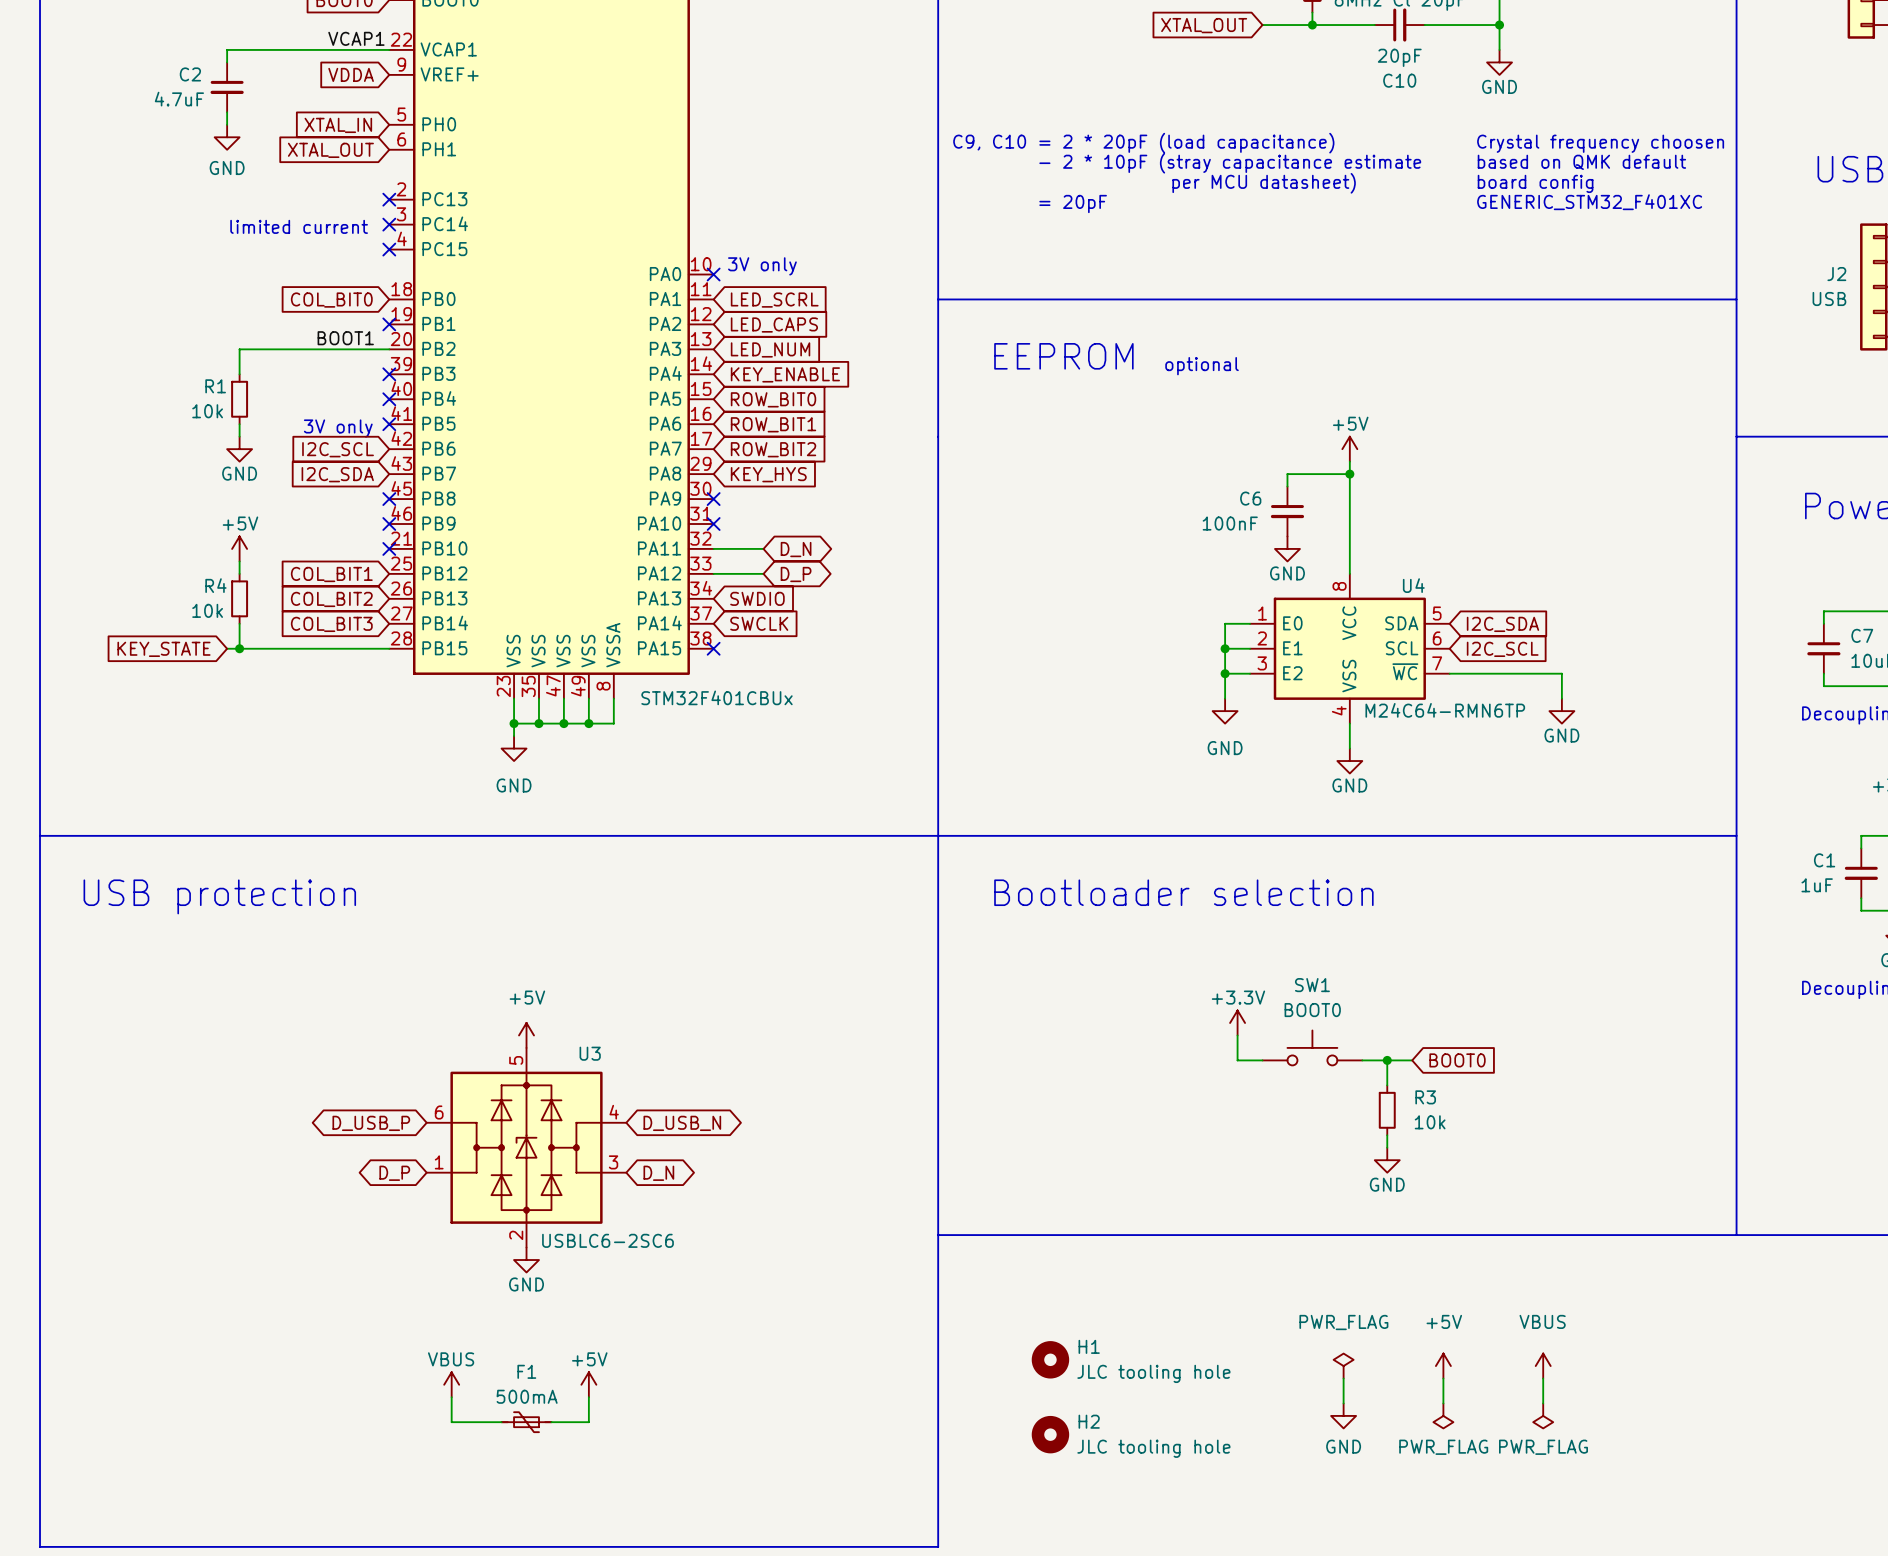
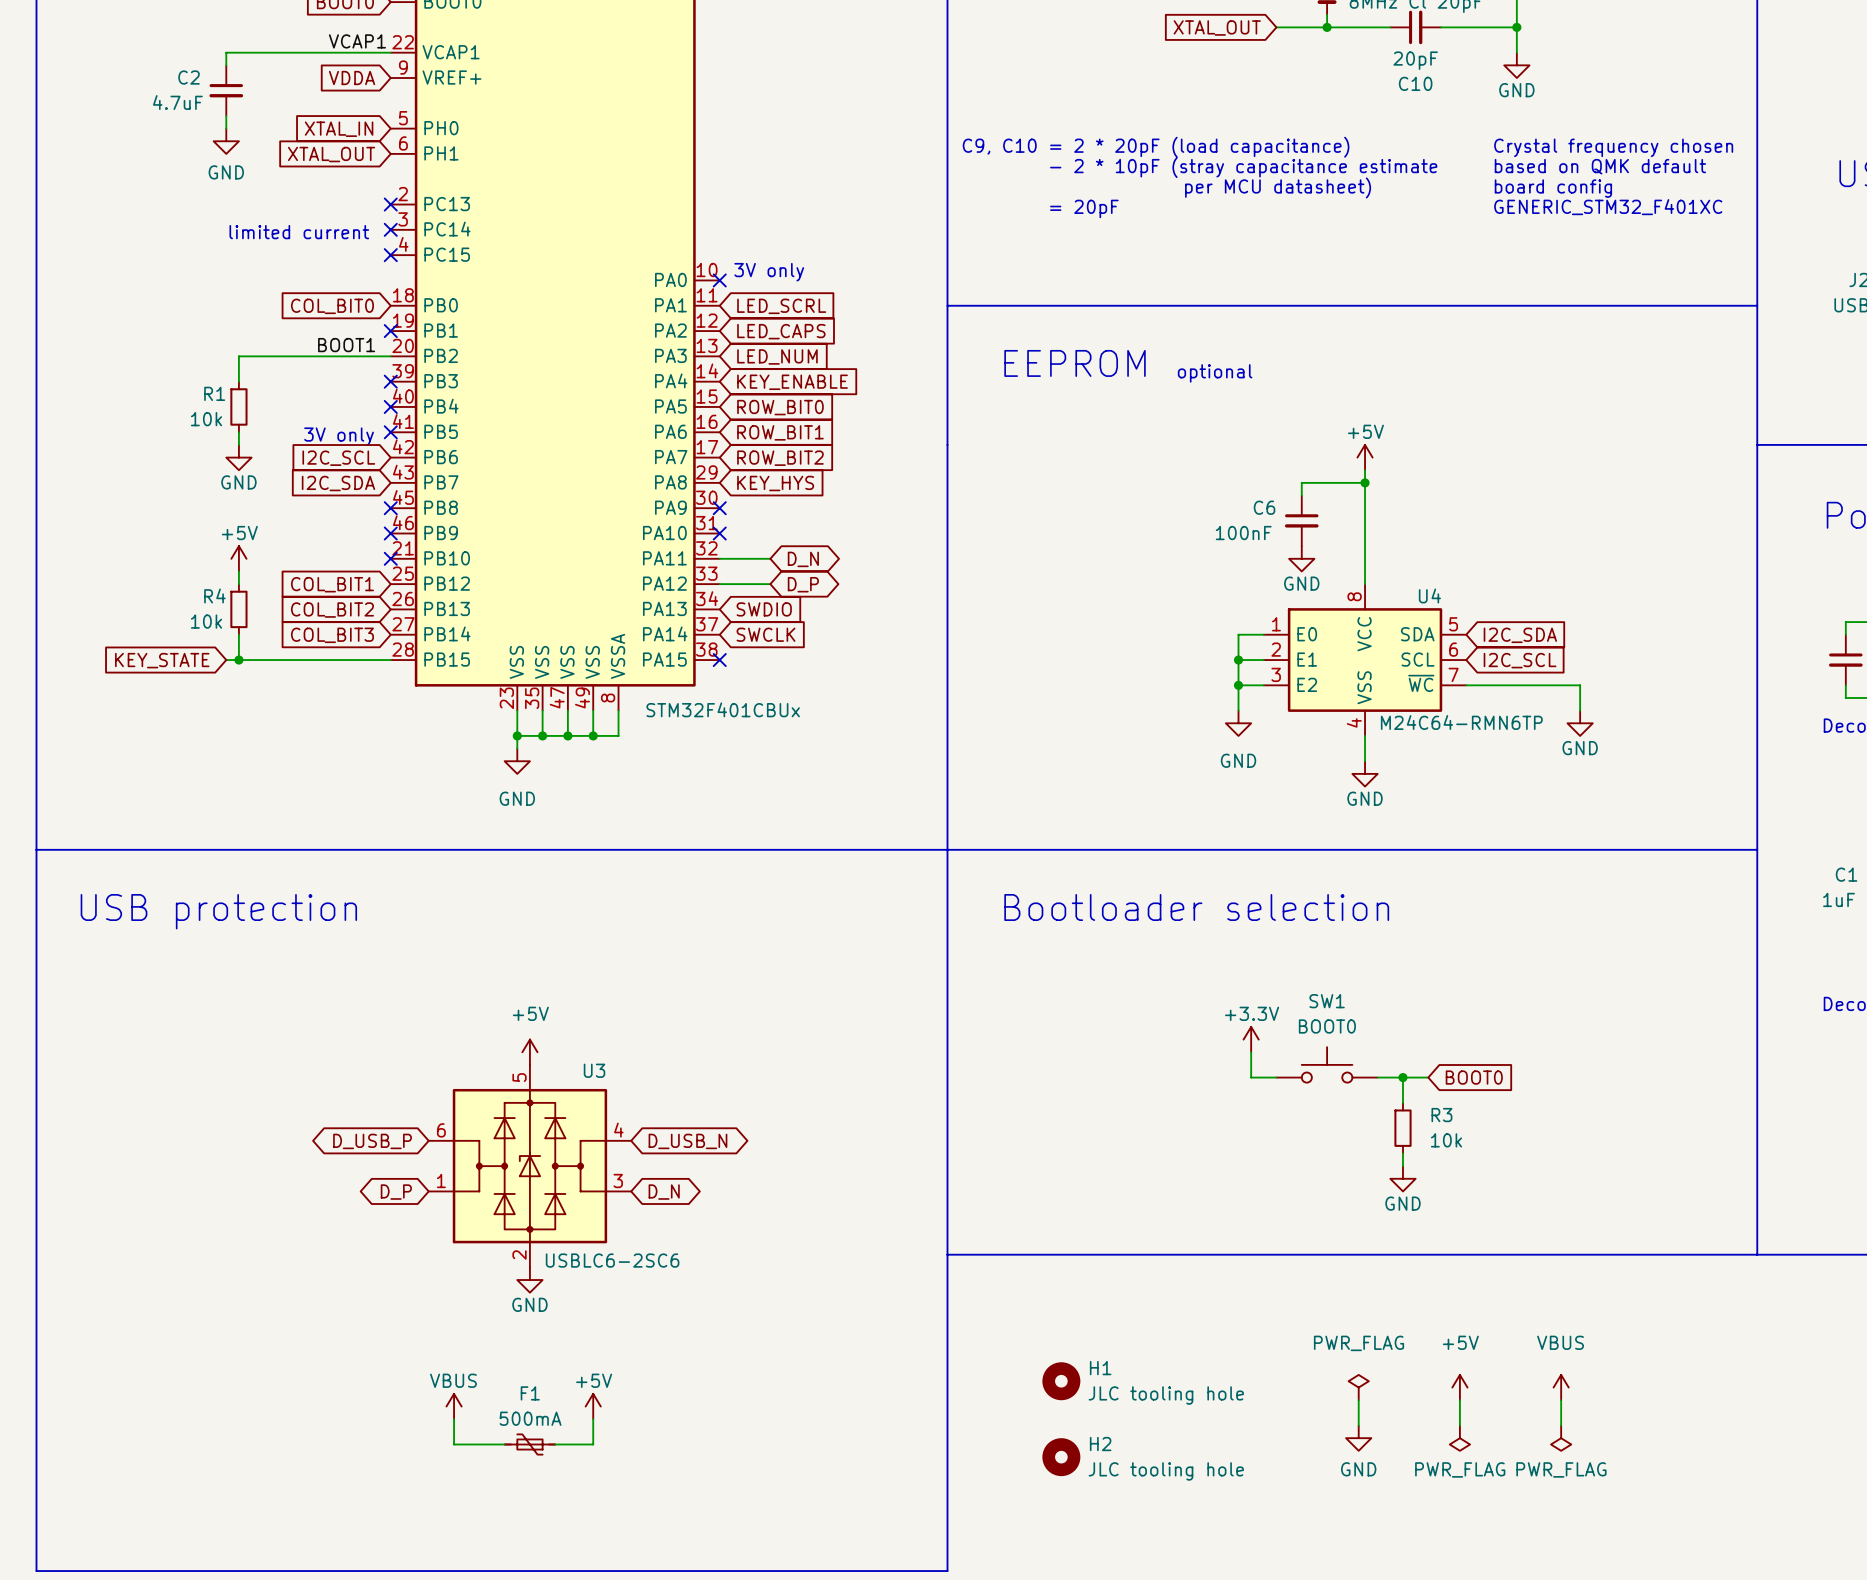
text: Crystal frequency choosen (1600, 143) -> Crystal frequency chosen (1613, 147)

